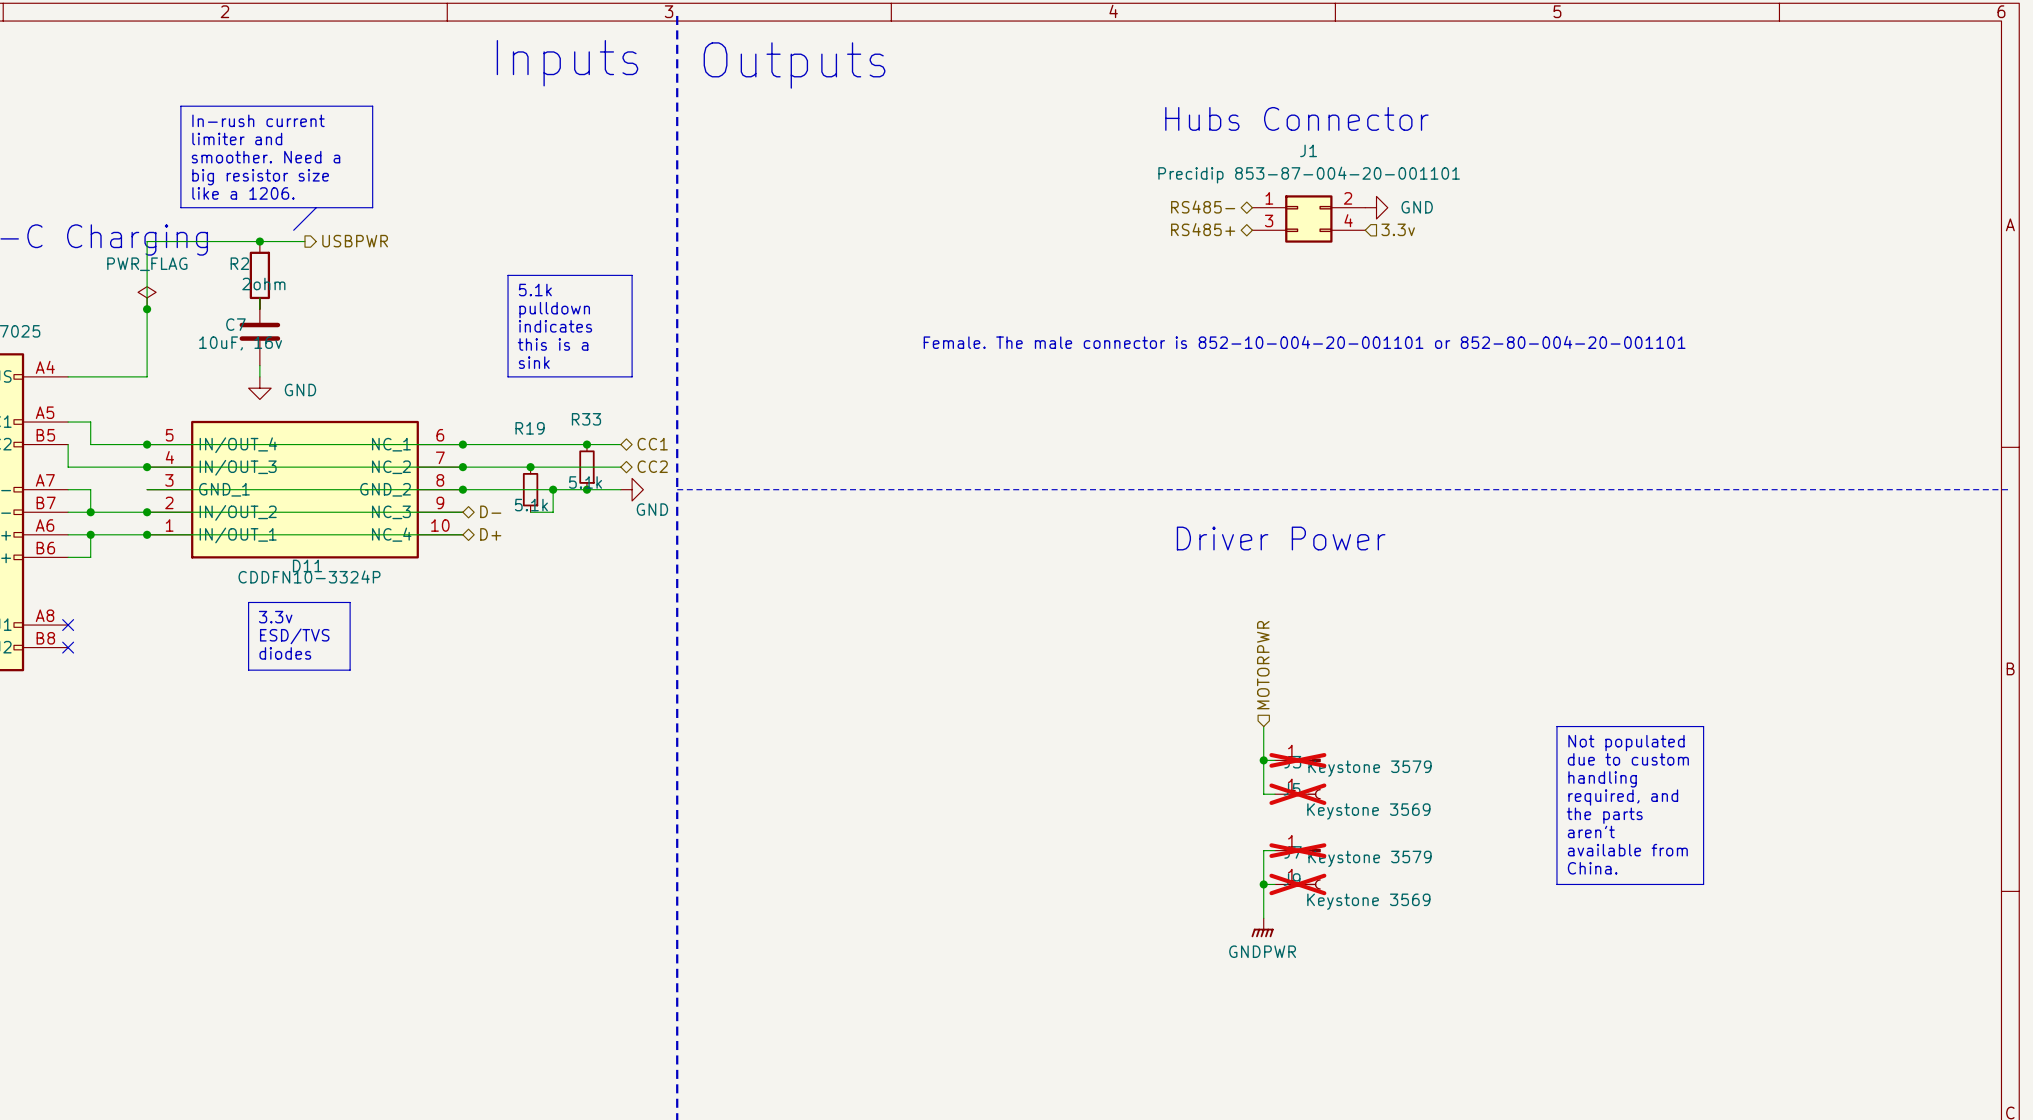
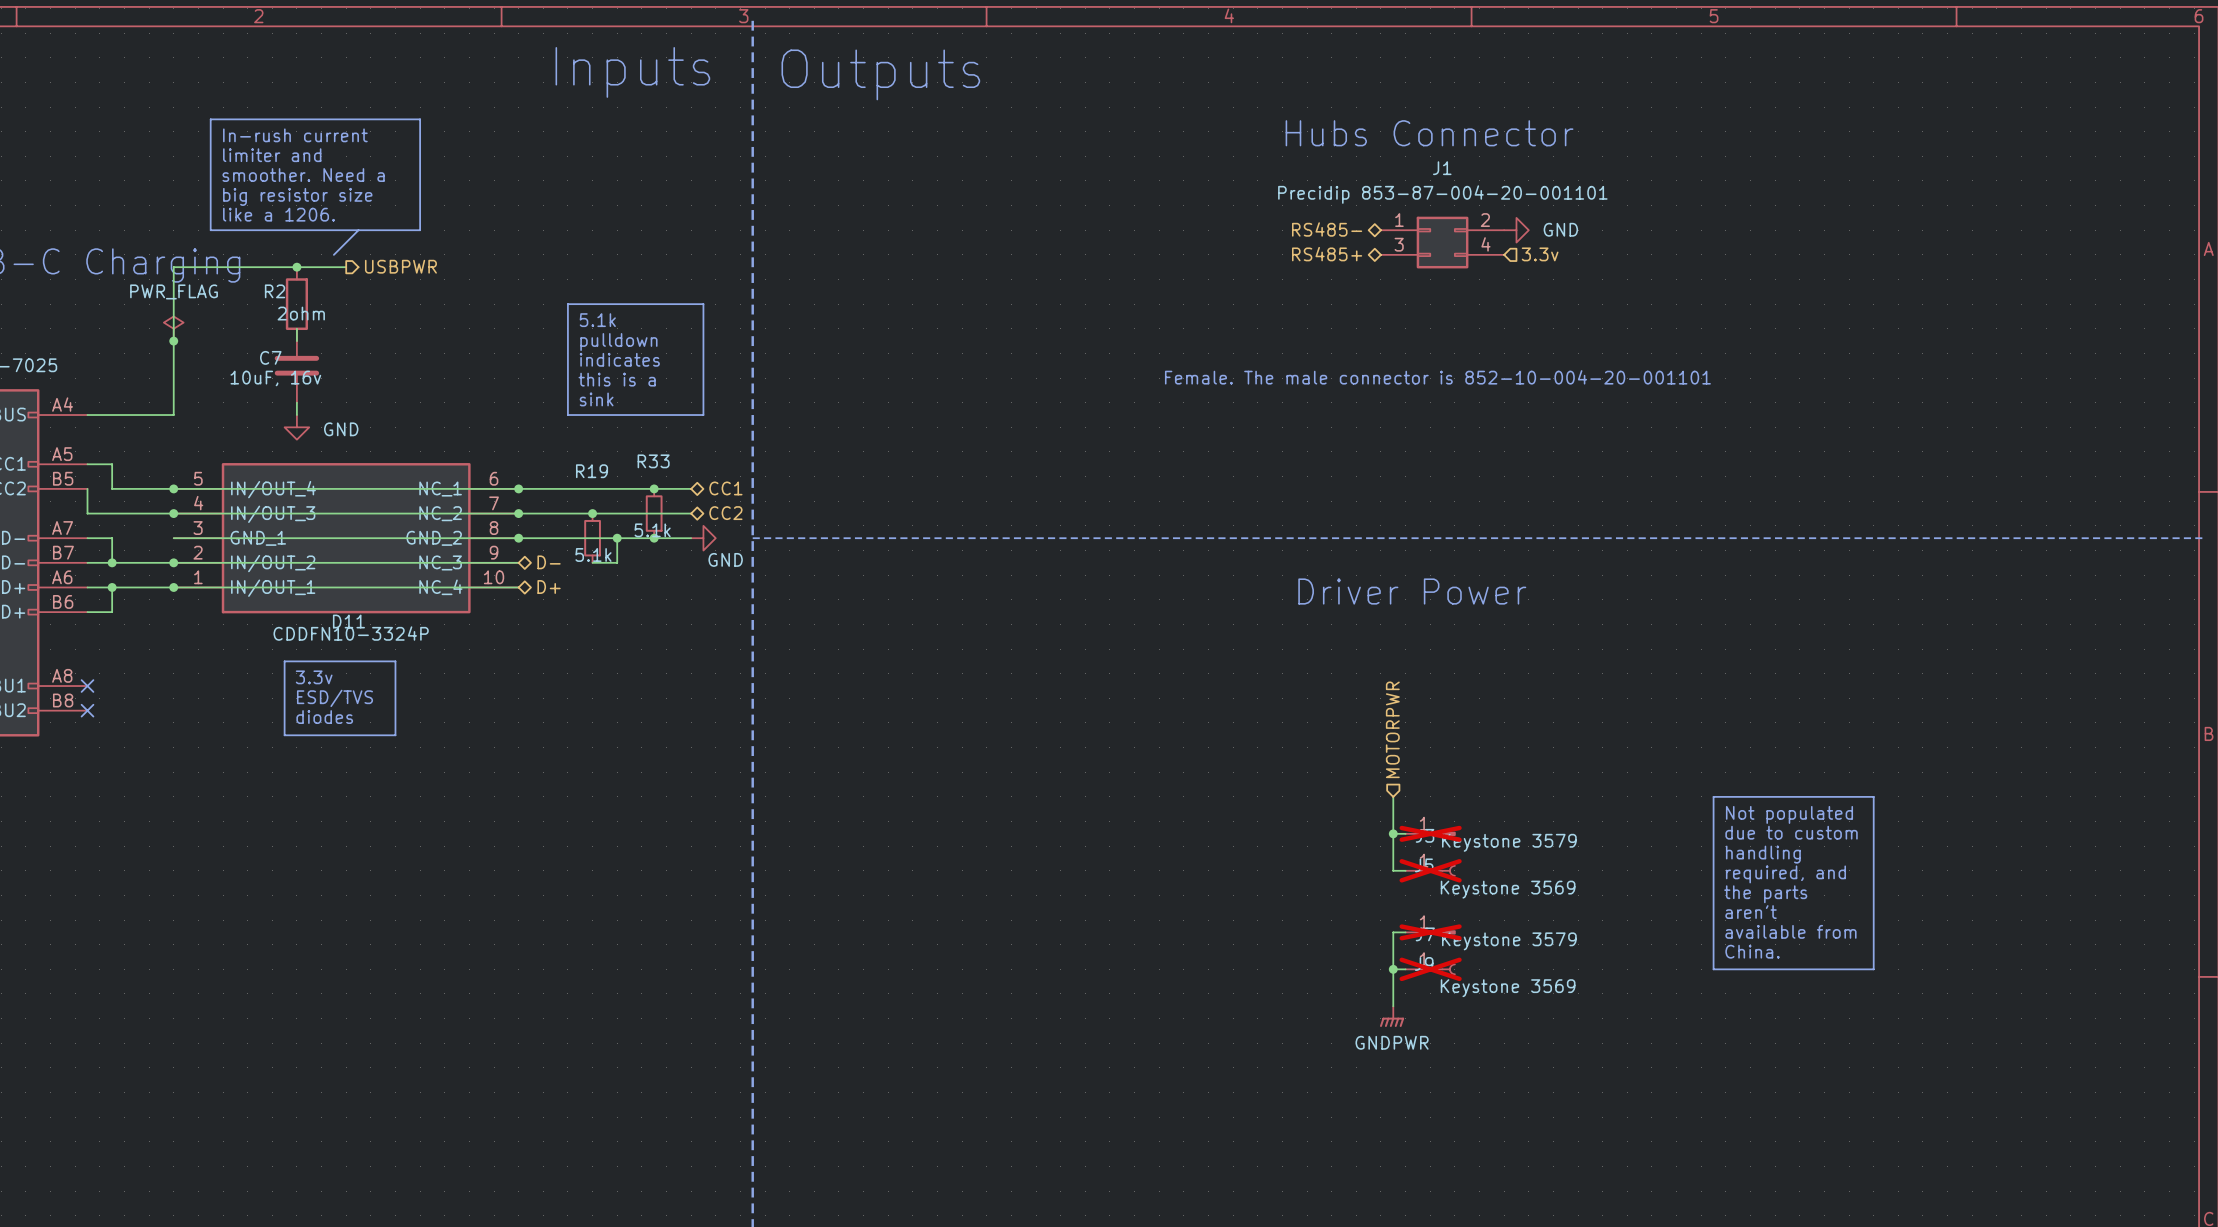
text: Female. The male connector is 852-10-004-20-001101 or 852-80-004-20-001101 (1304, 342) -> Female. The male connector is 852-10-004-20-001101 (1437, 377)

